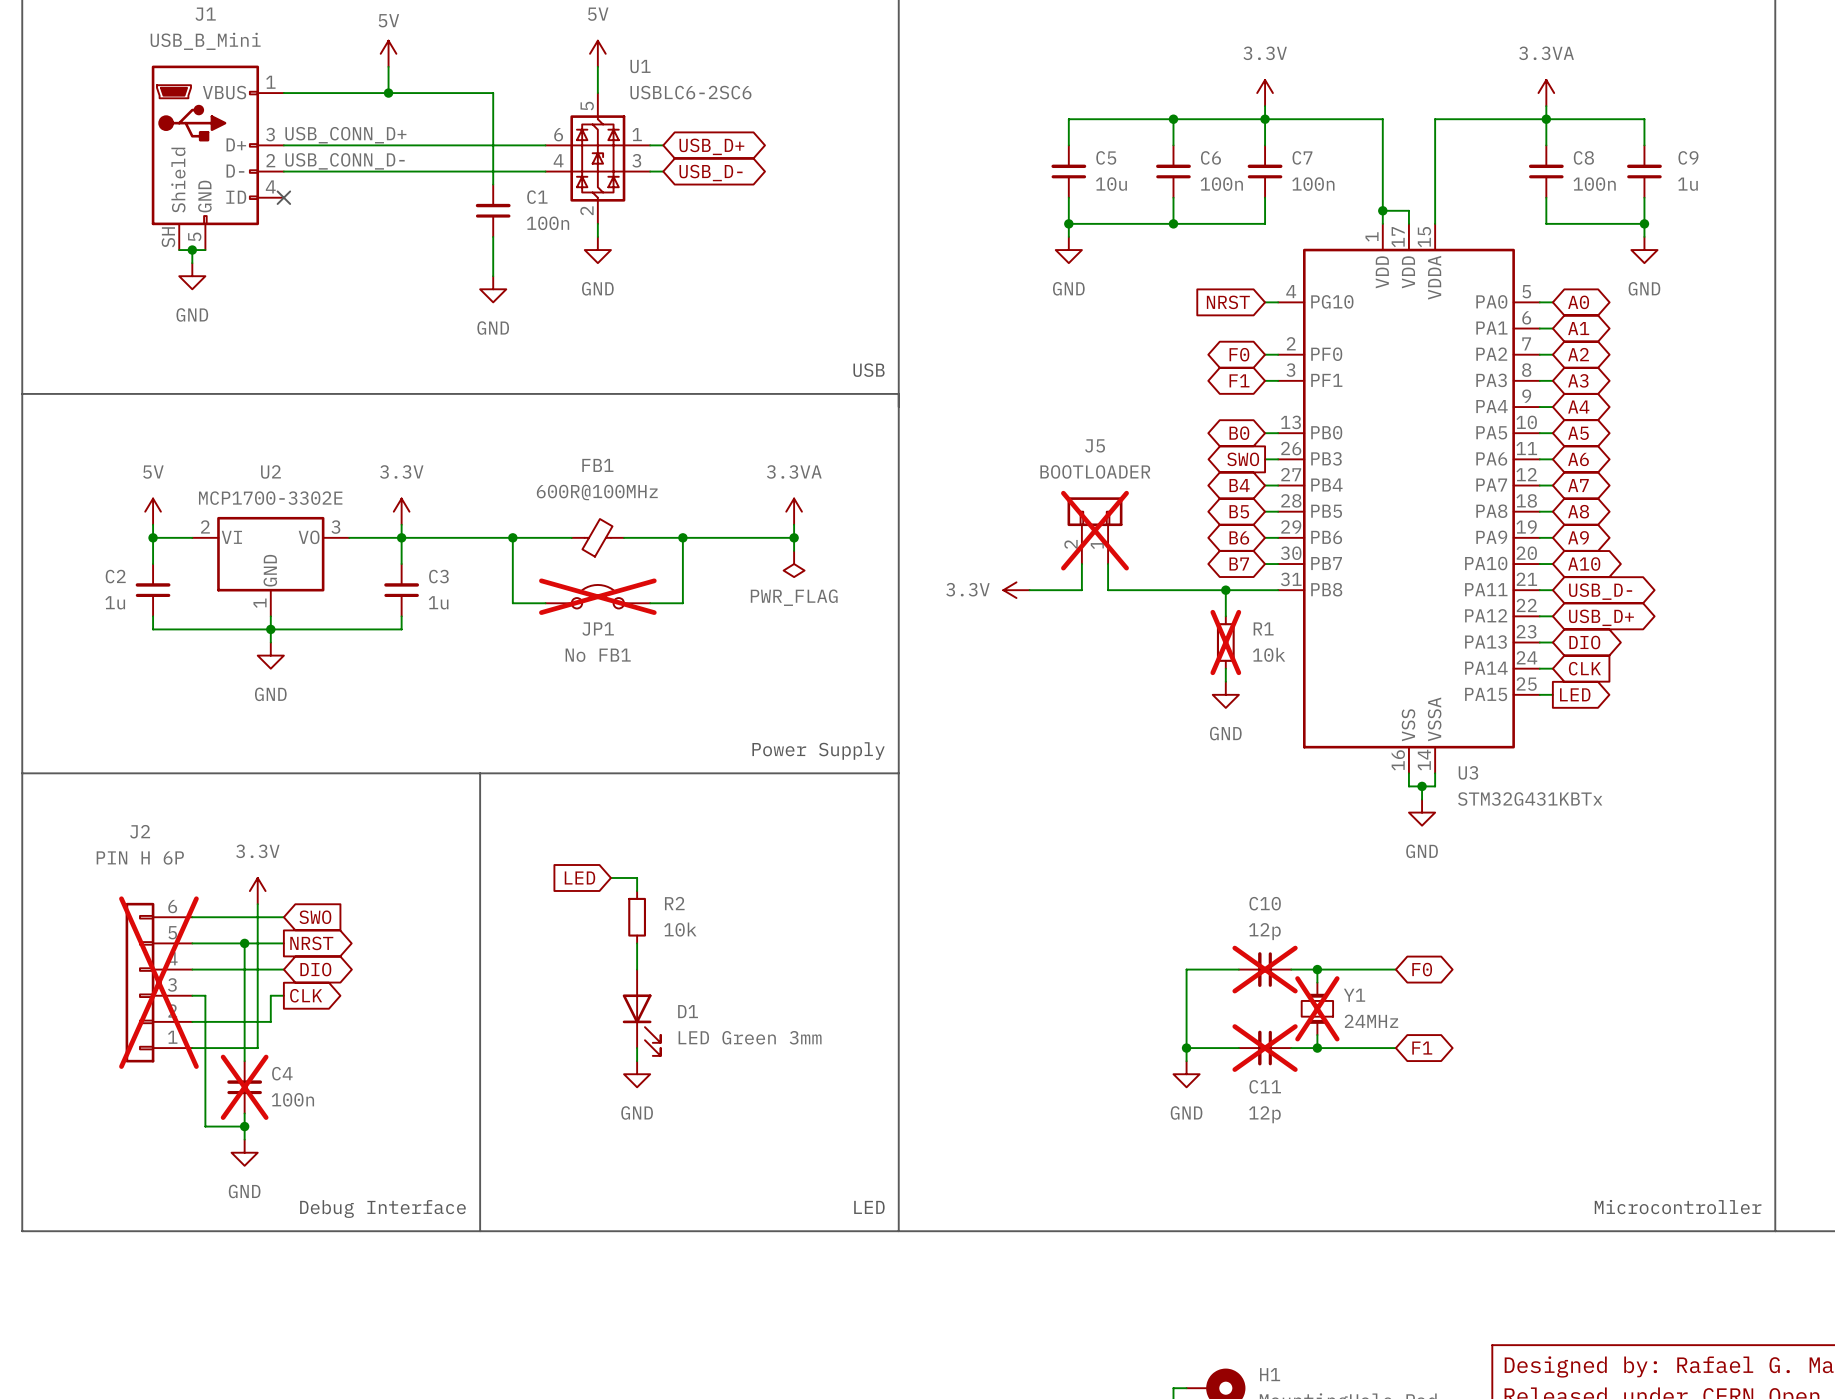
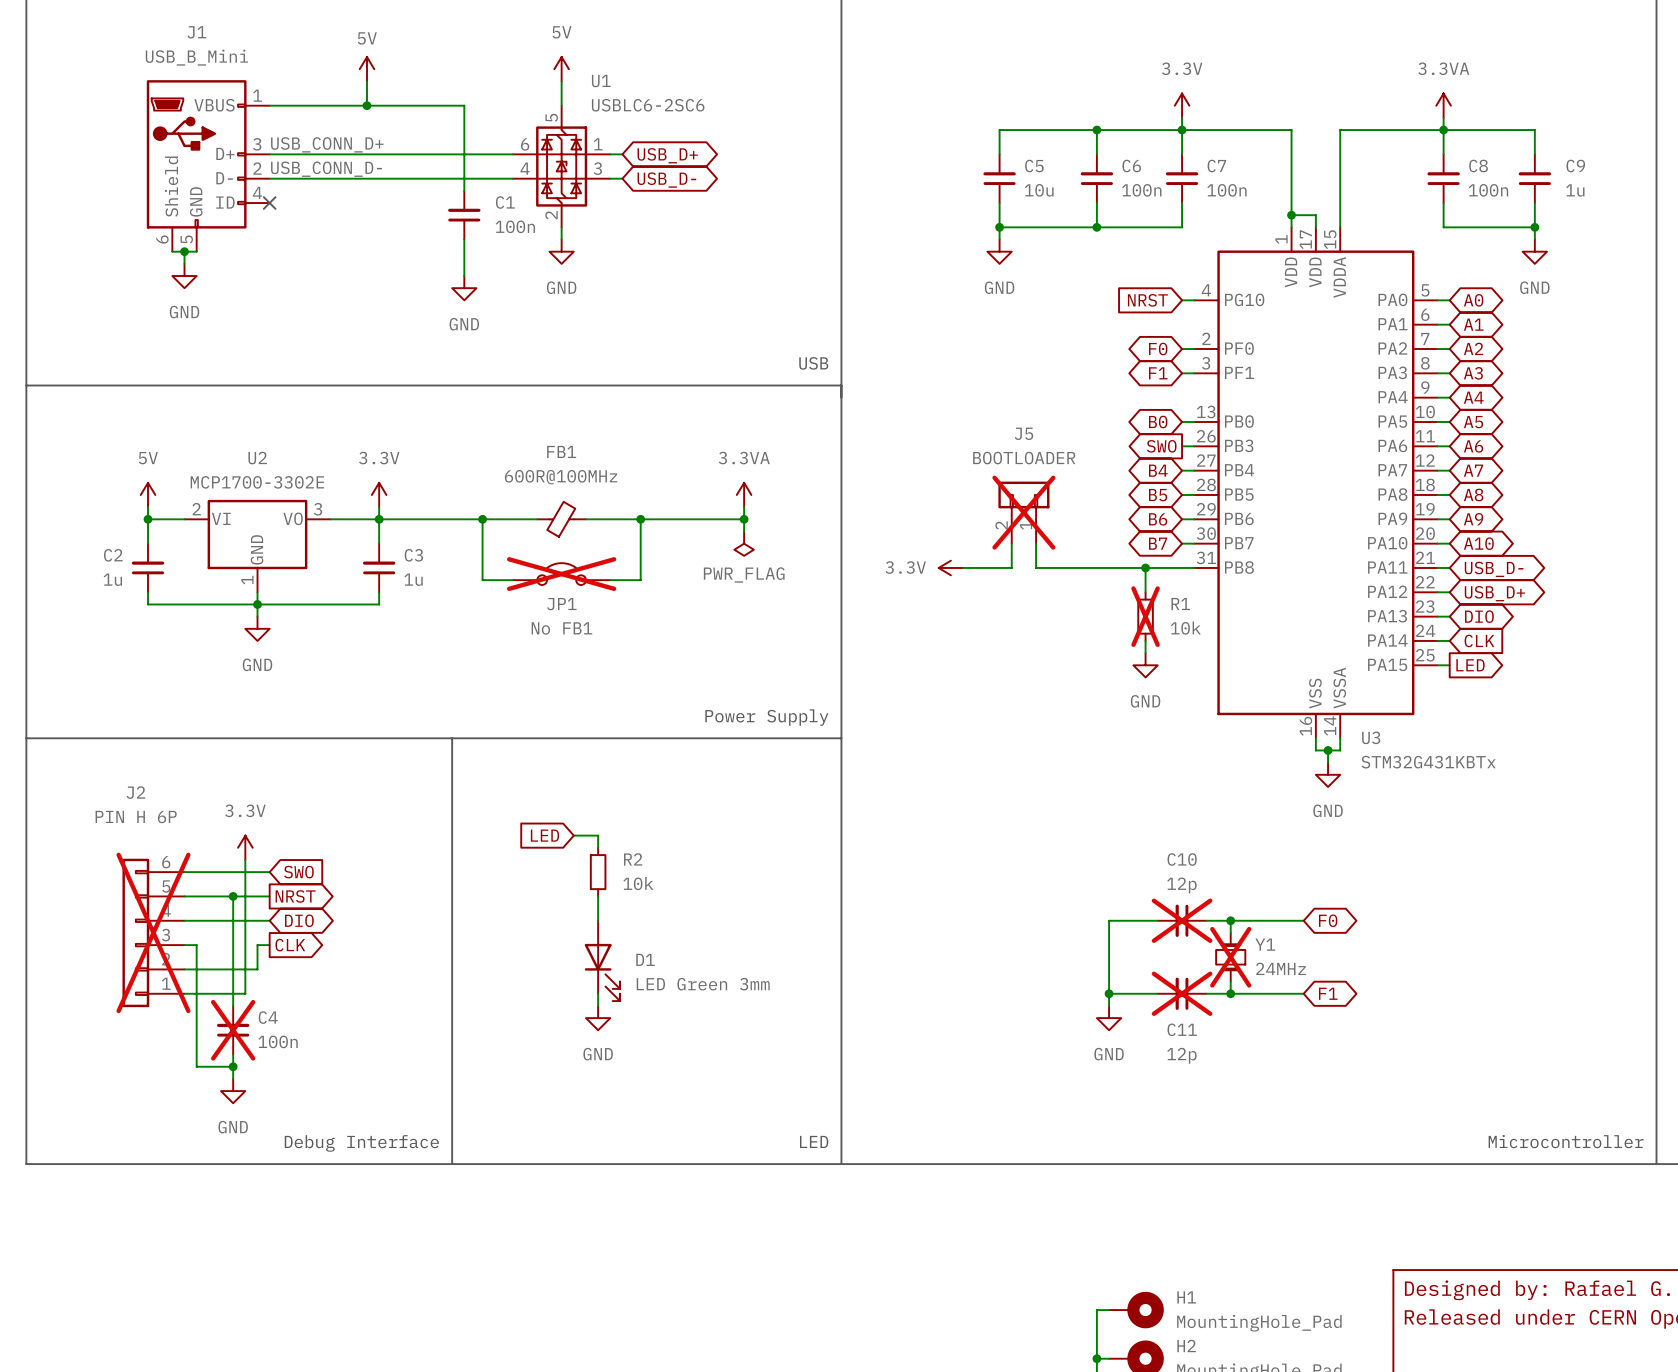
J1 pin number: SH (168, 237) -> 6 (162, 239)

